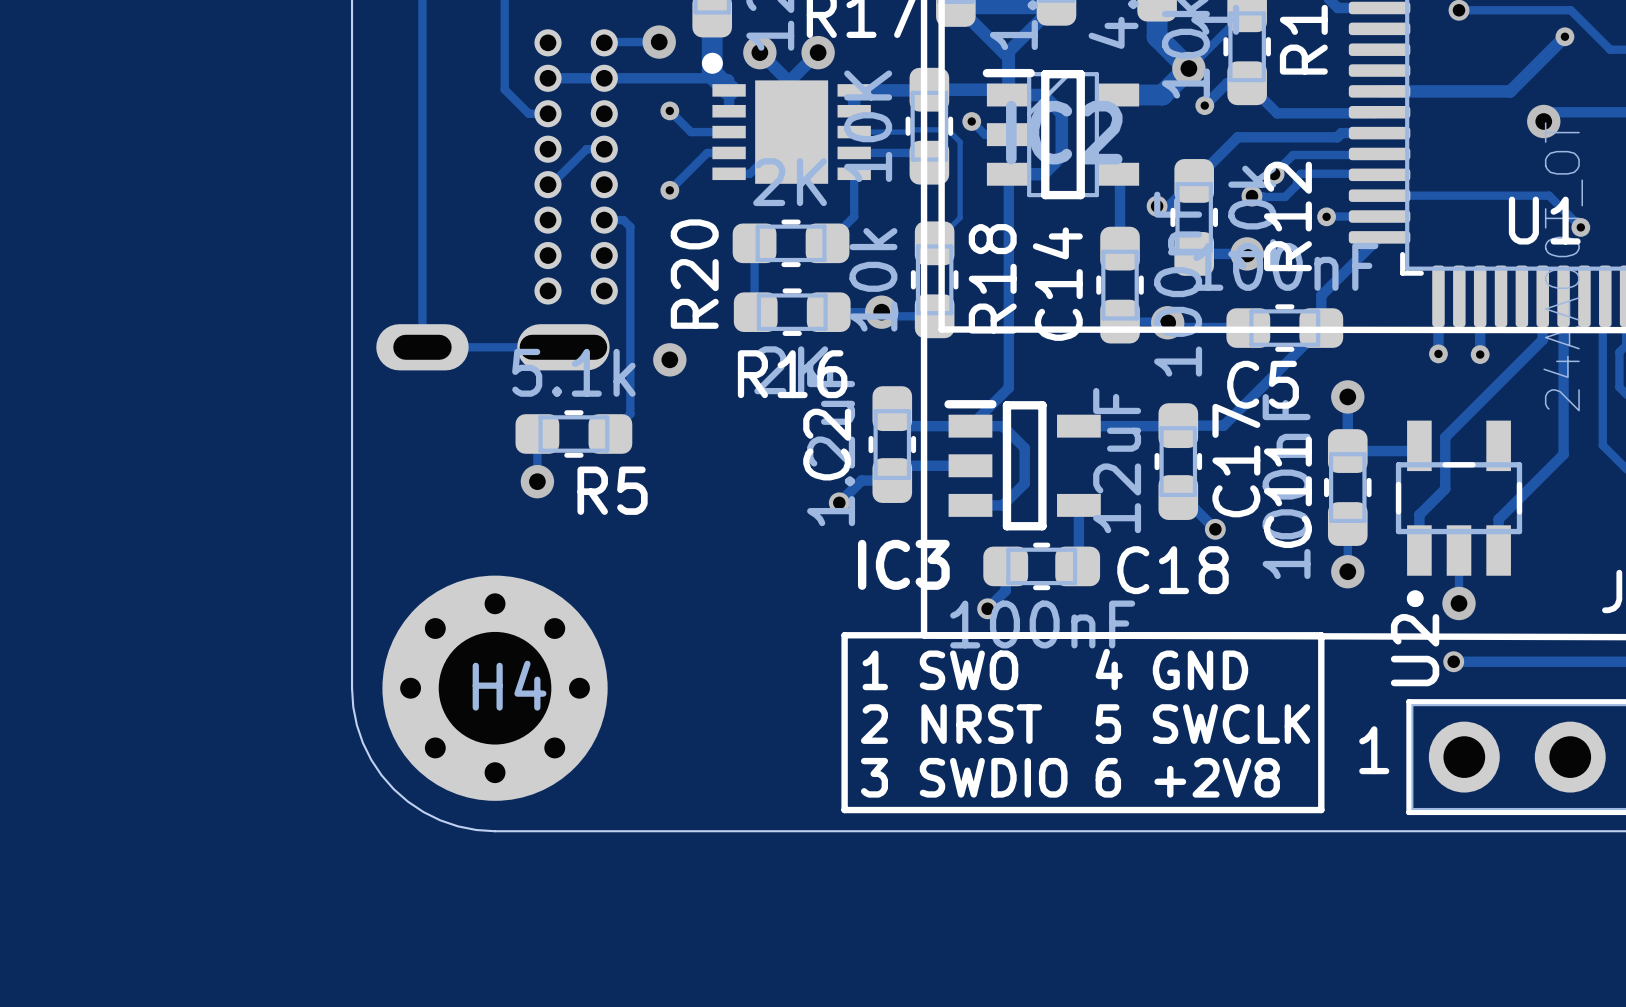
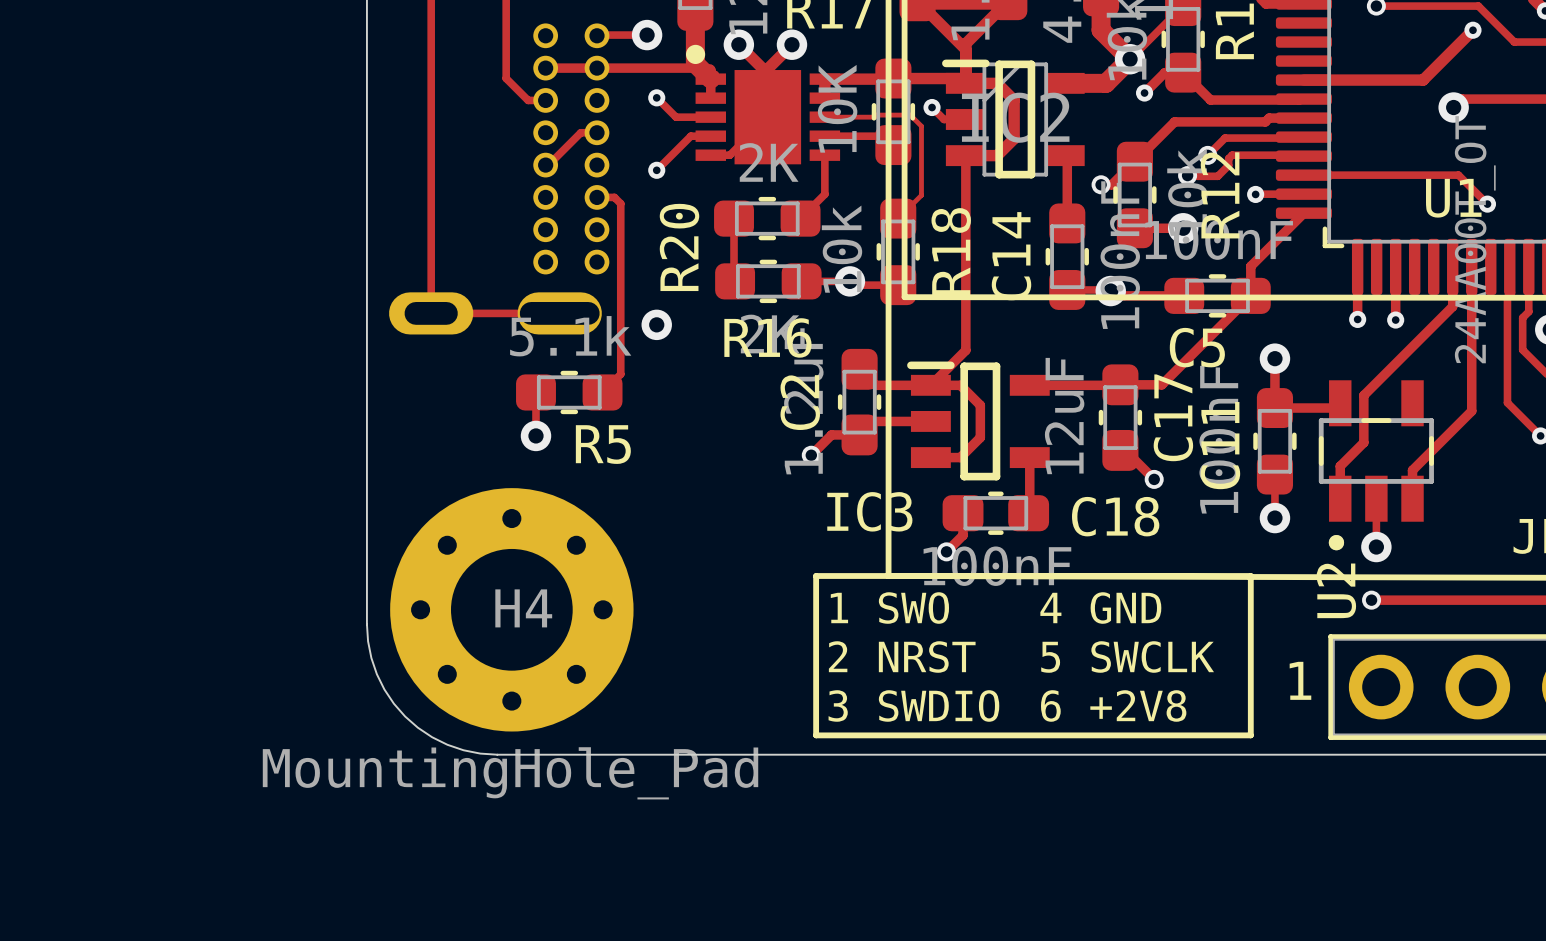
H4 footprint: [382, 575, 608, 801] -> [390, 488, 634, 732]
H4 value: none -> MountingHole_Pad (510, 773)

